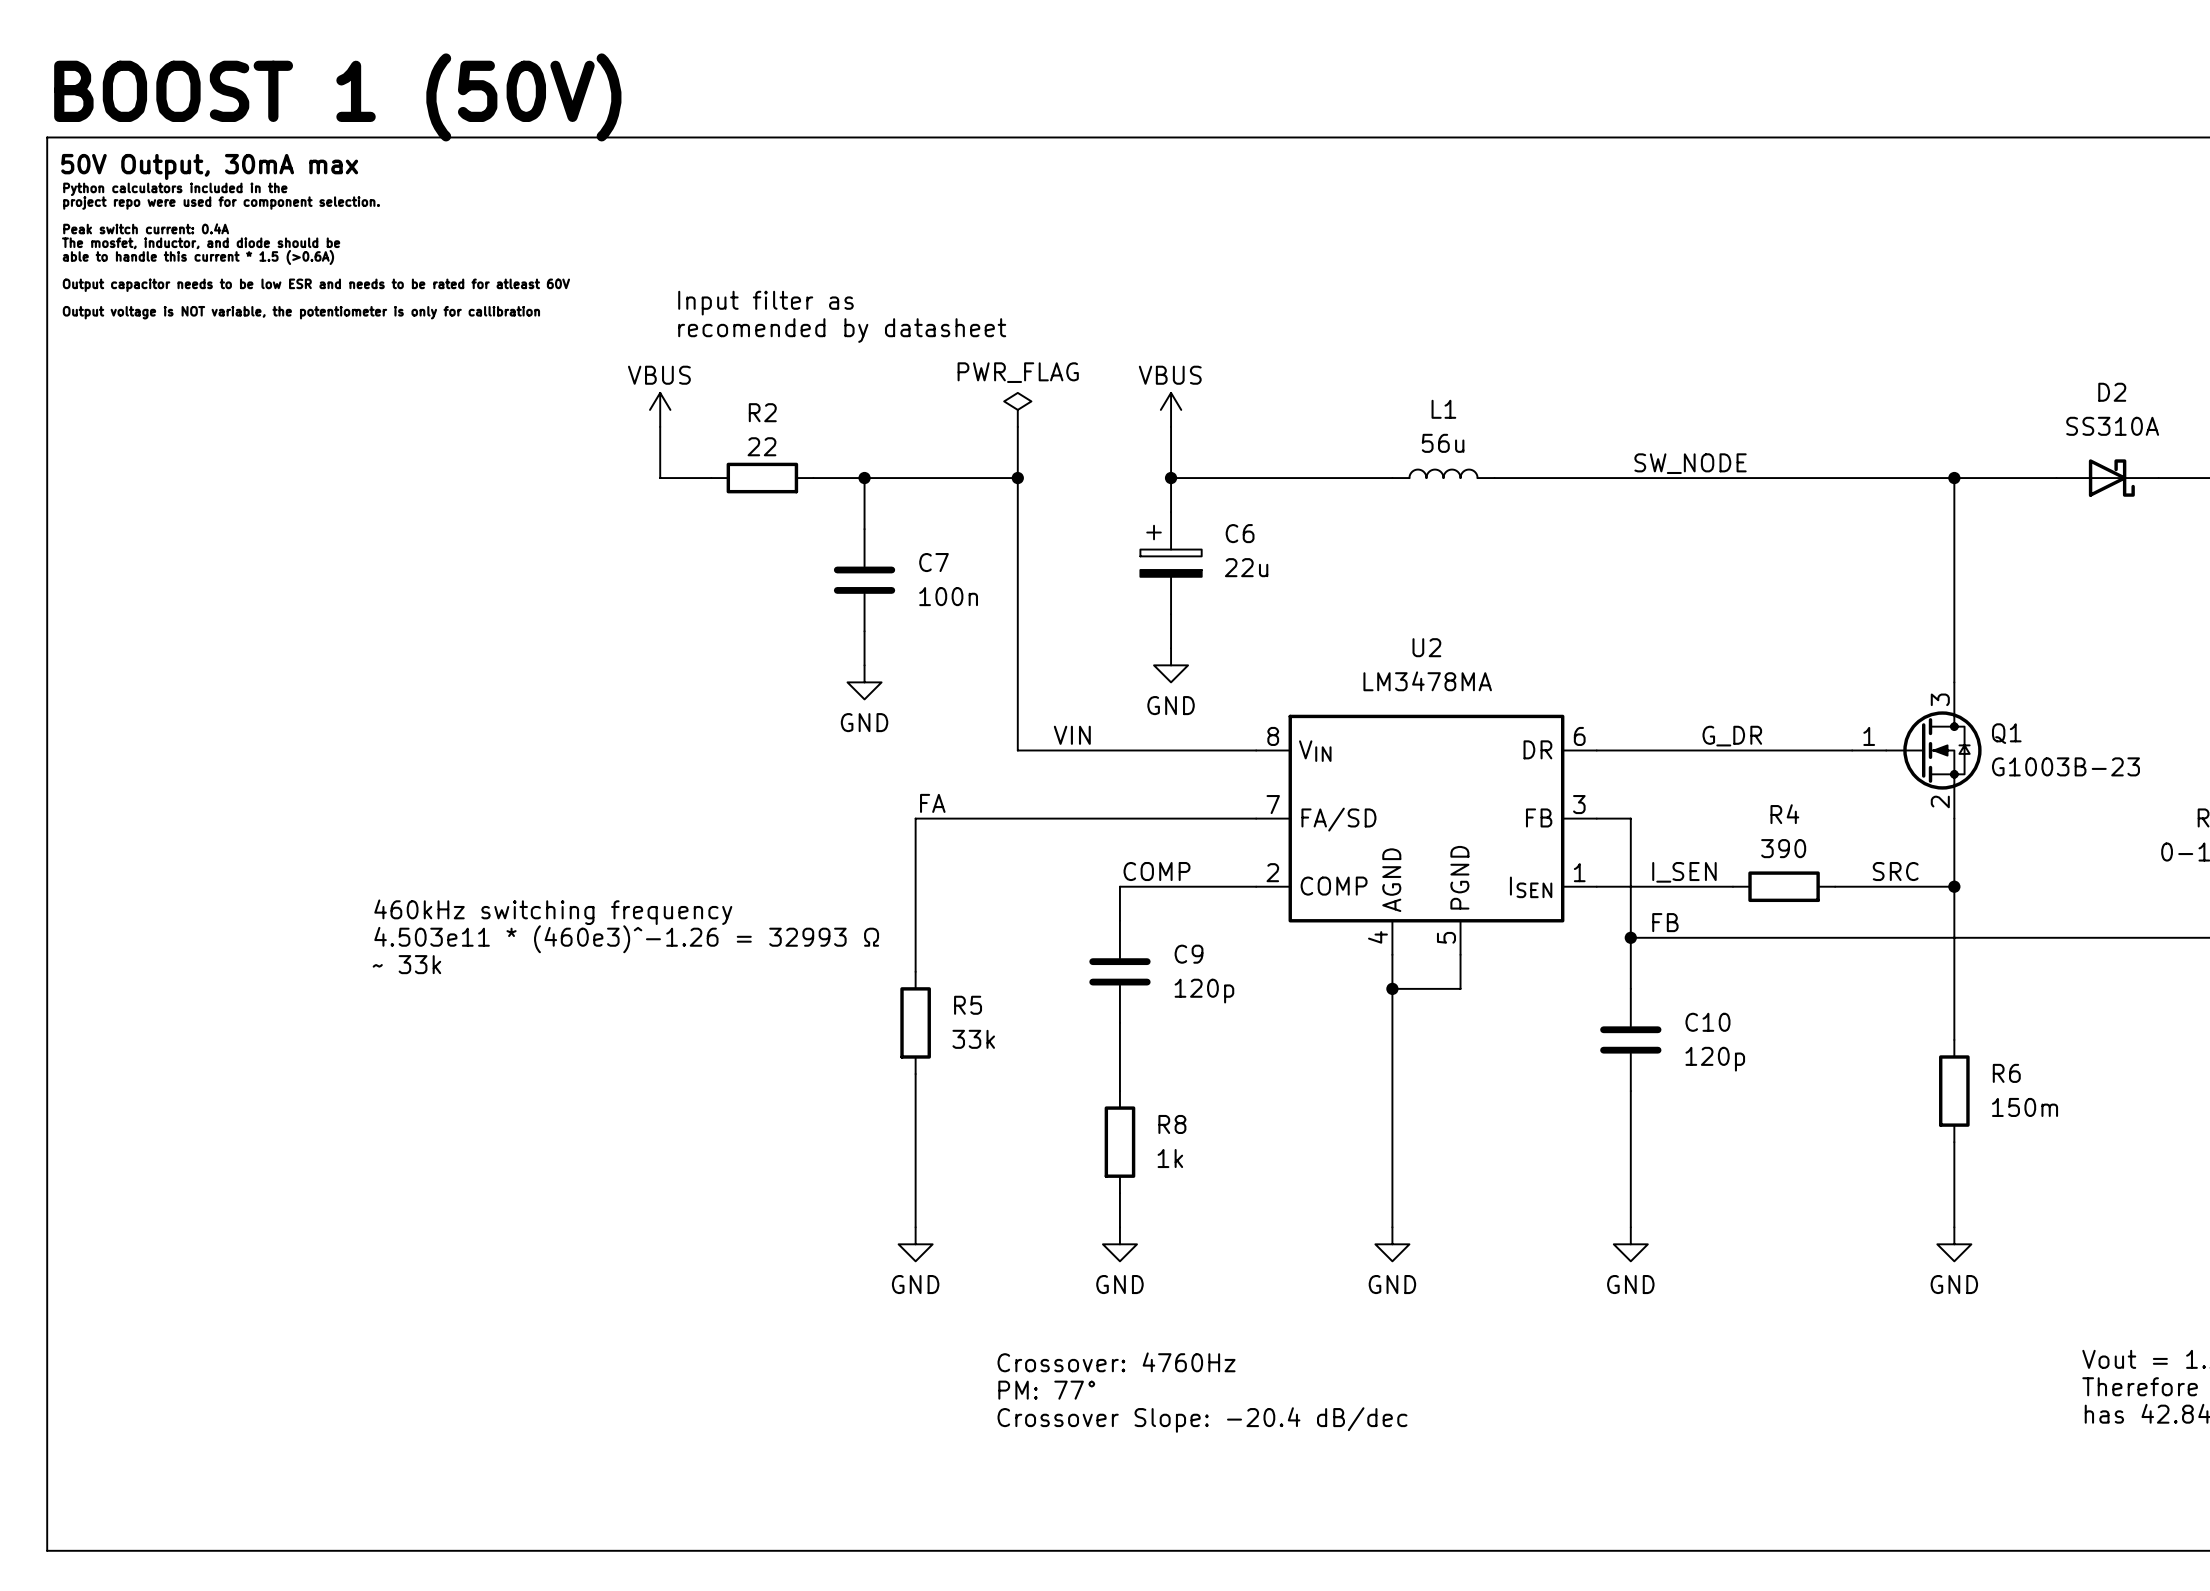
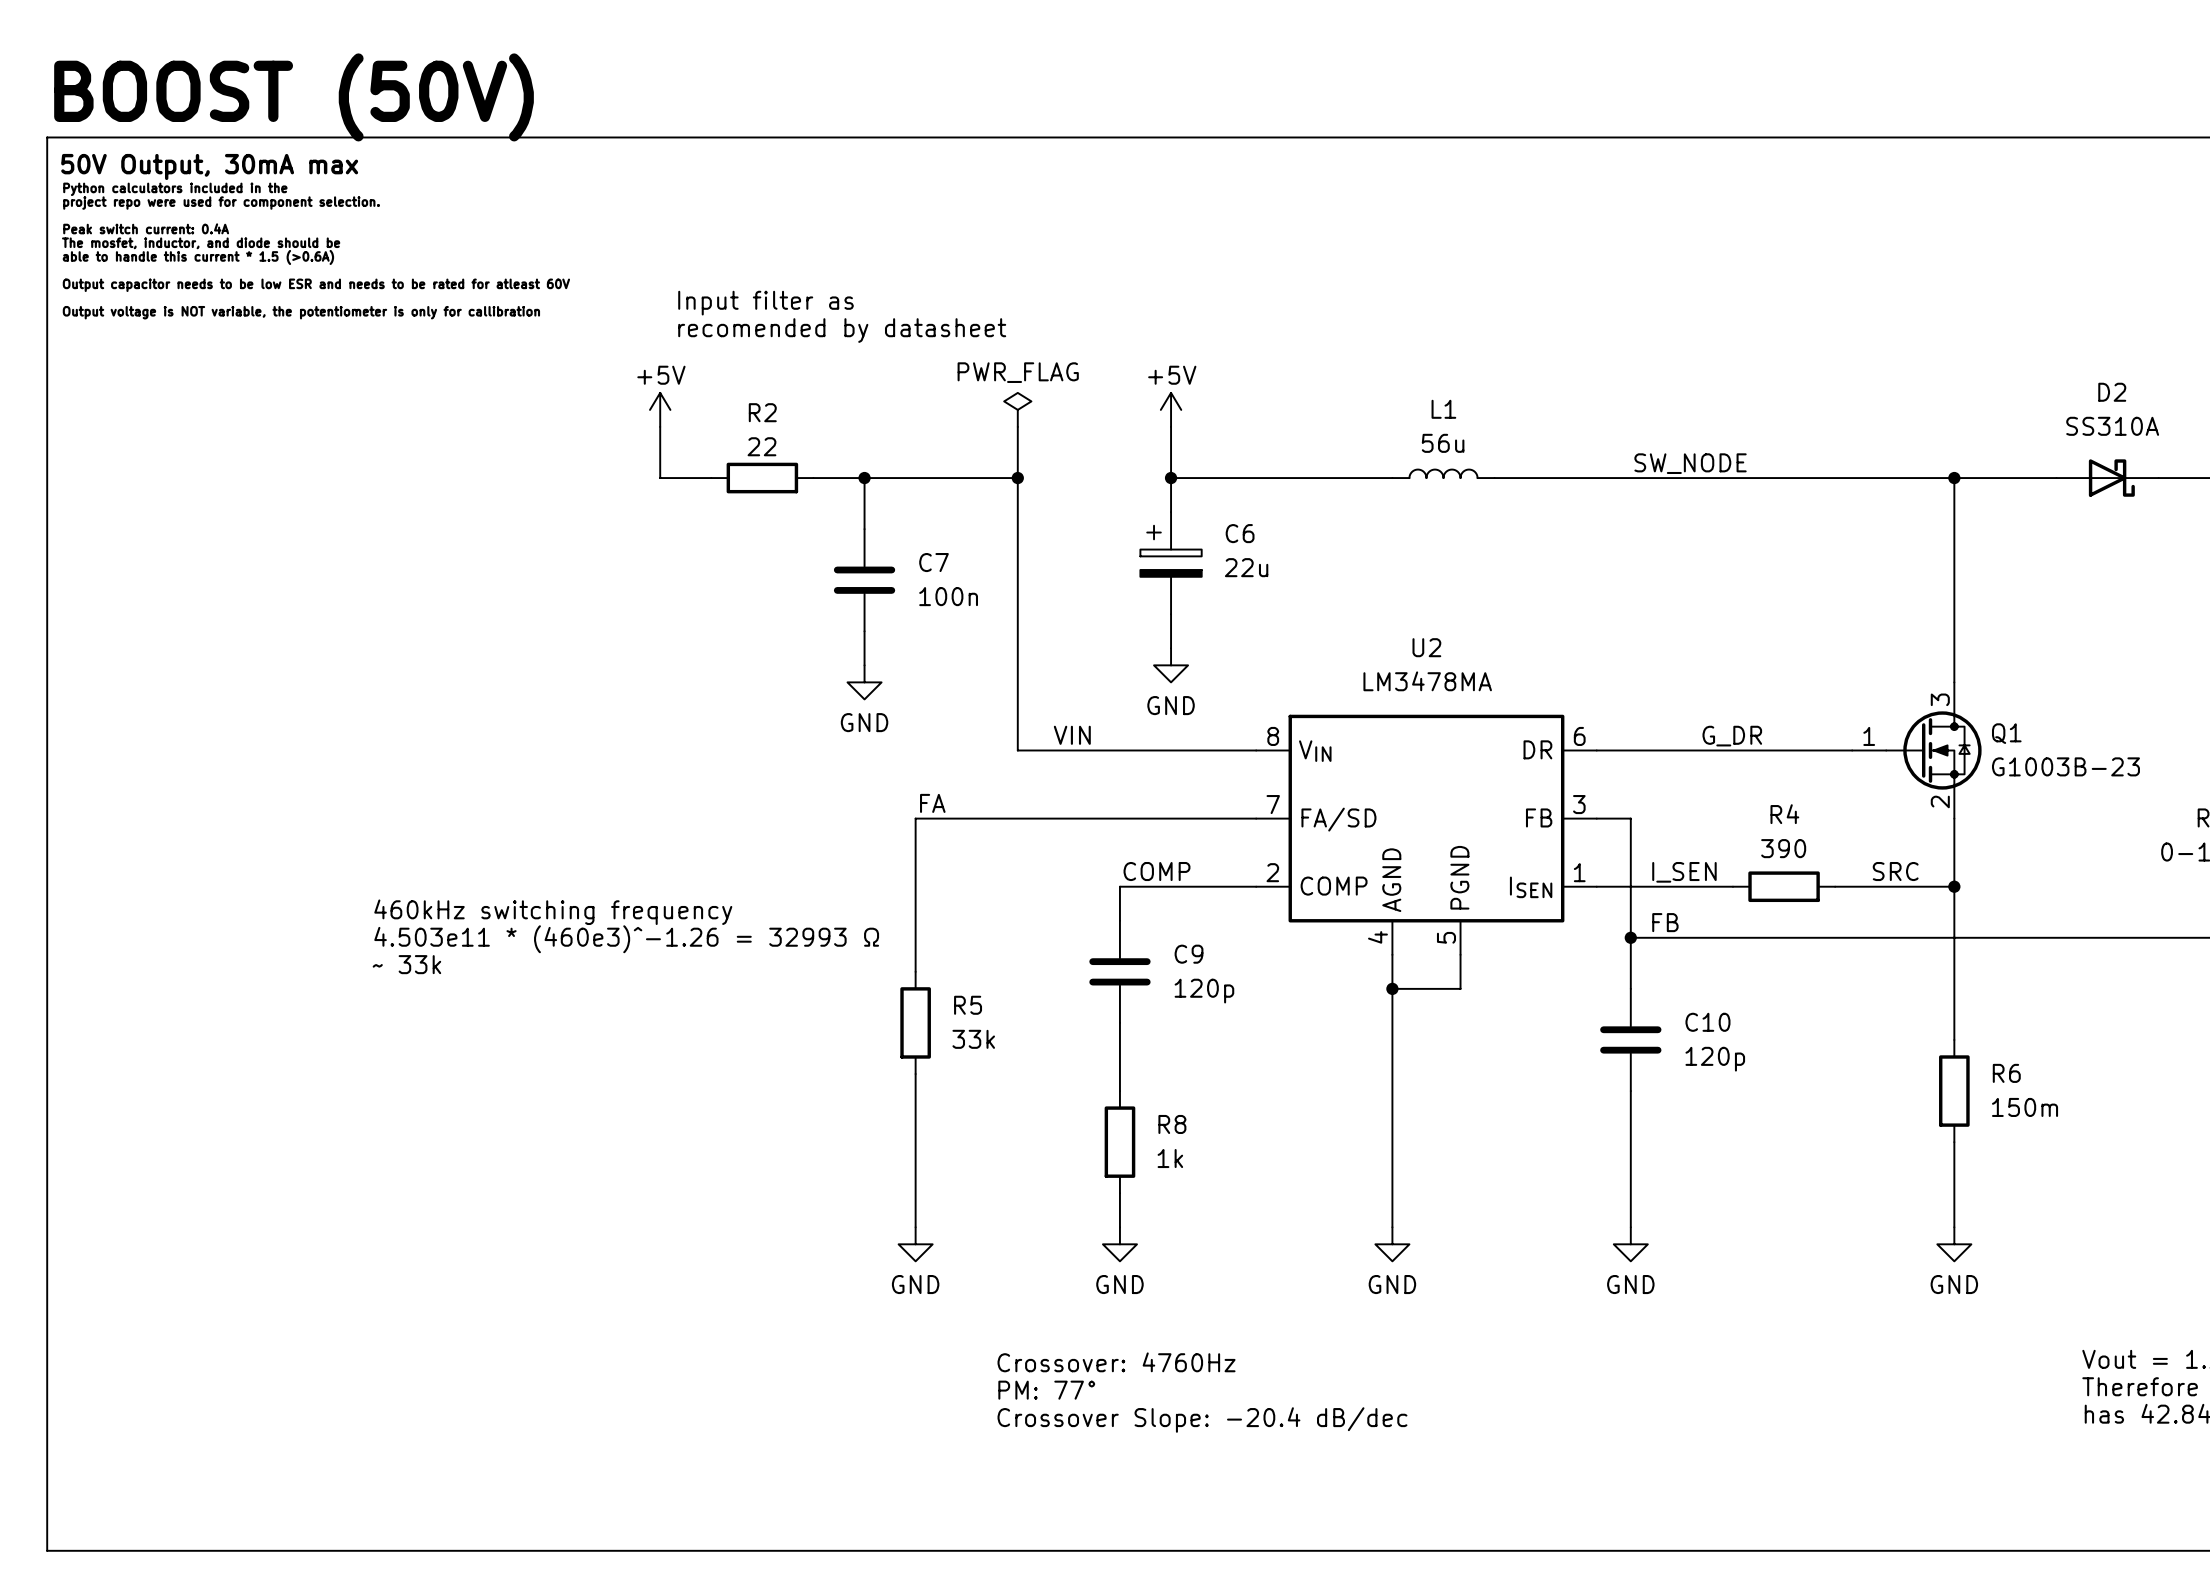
text: BOOST 1 (50V) (337, 97) -> BOOST (50V) (294, 97)
power symbol: VBUS (660, 409) -> +5V (660, 409)
power symbol: VBUS (1171, 409) -> +5V (1171, 409)

